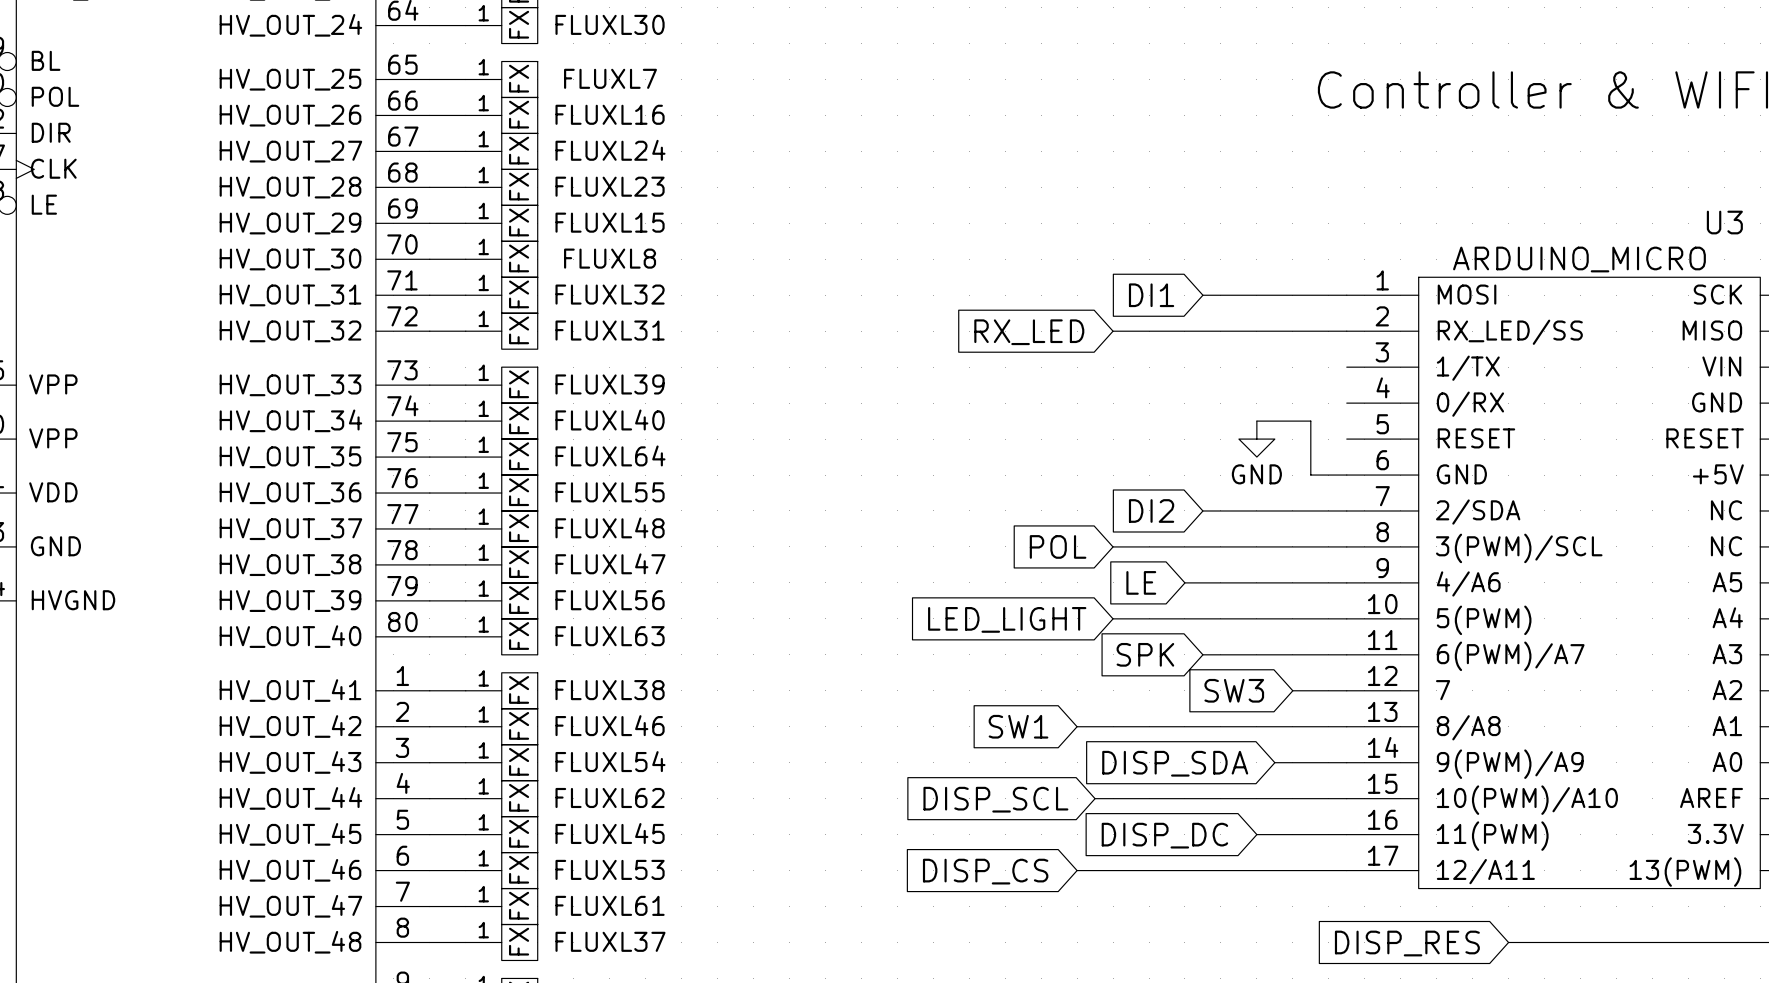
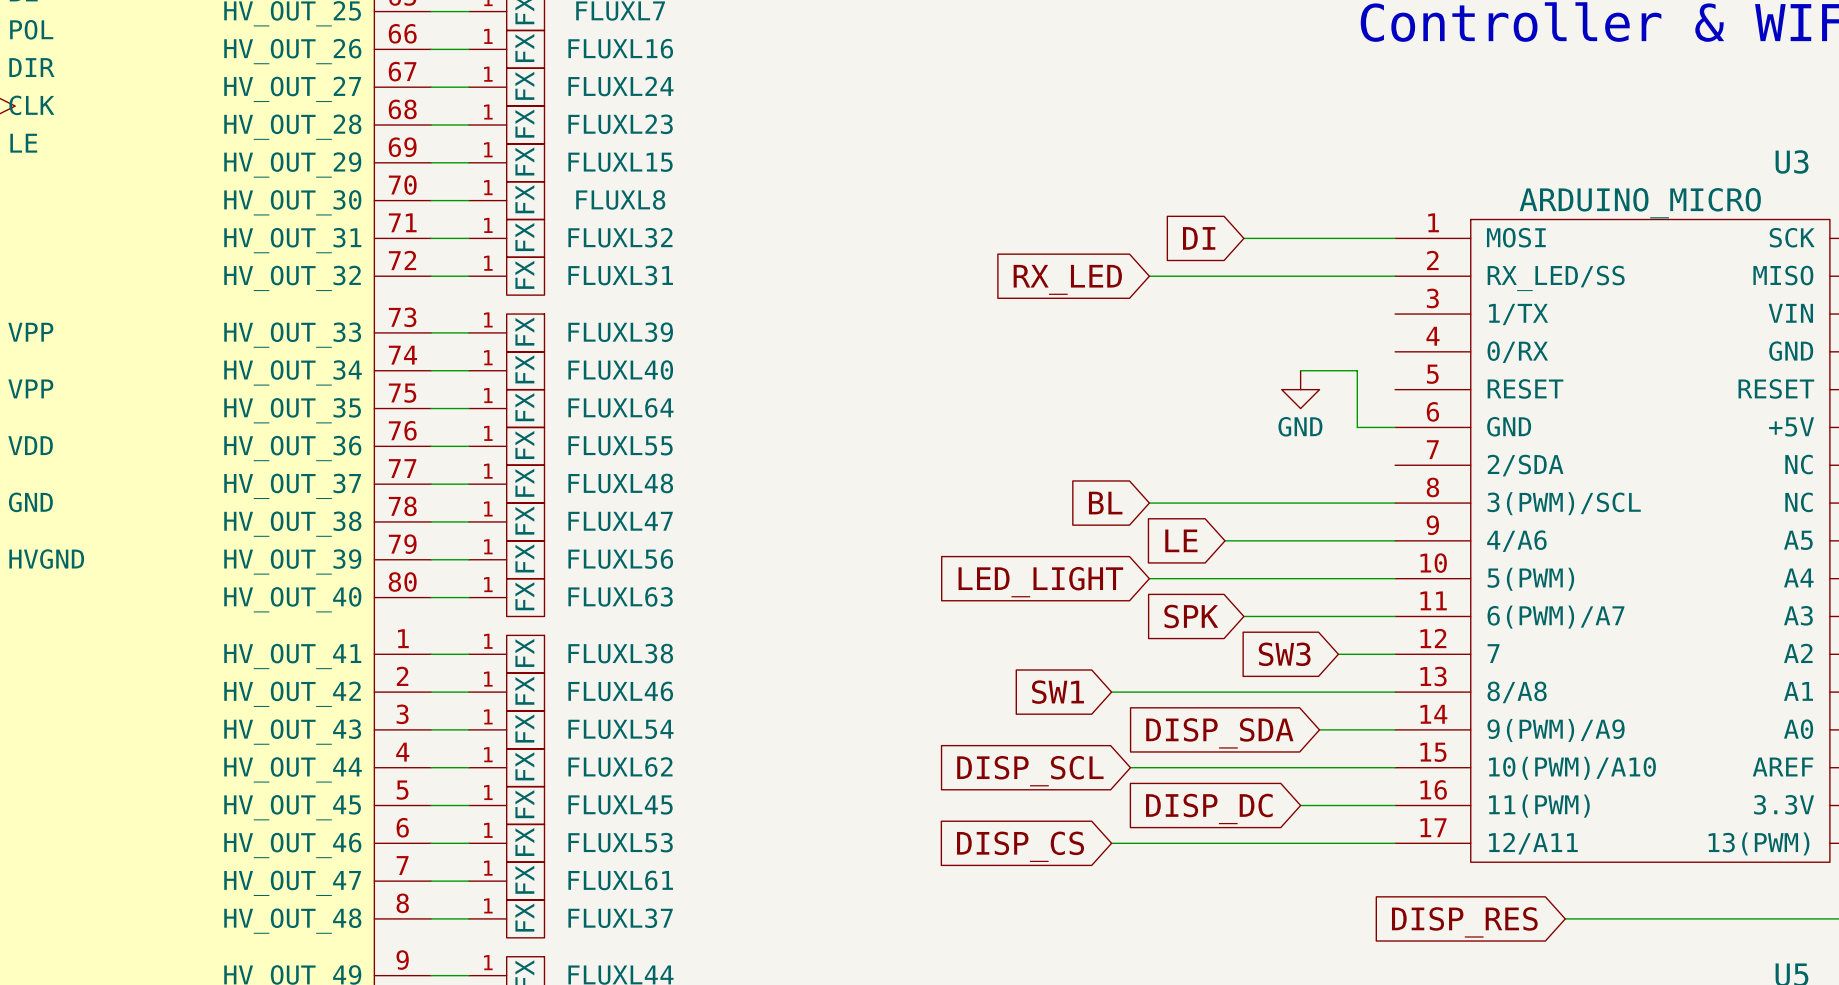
global label: DI1 (1151, 295) -> DI (1199, 238)
global label: DI2 (1151, 510) -> none
wire: (1202, 510) (1346, 510) -> none
global label: POL (1058, 546) -> BL (1105, 503)

